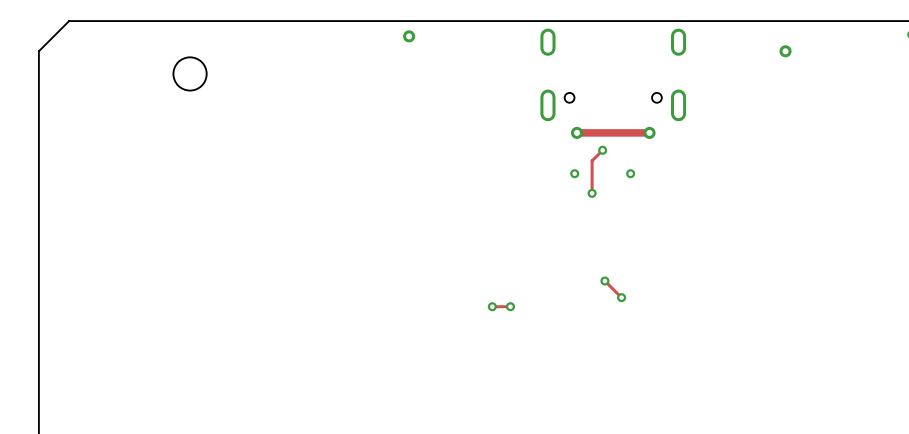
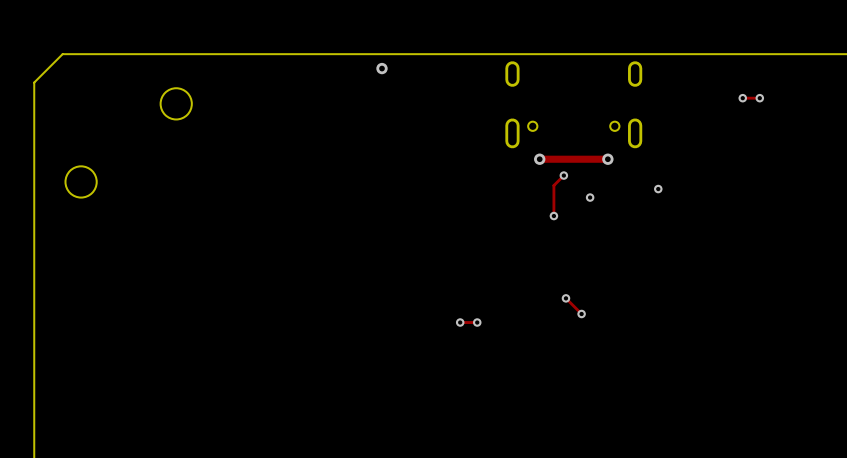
via: (785, 51) -> none
track: none -> (742, 98) (759, 98)
via: none -> (742, 98)
via: none -> (759, 98)
round board edge: none -> [65, 165, 98, 198]
via: none -> (658, 189)
via: (574, 173) -> none

